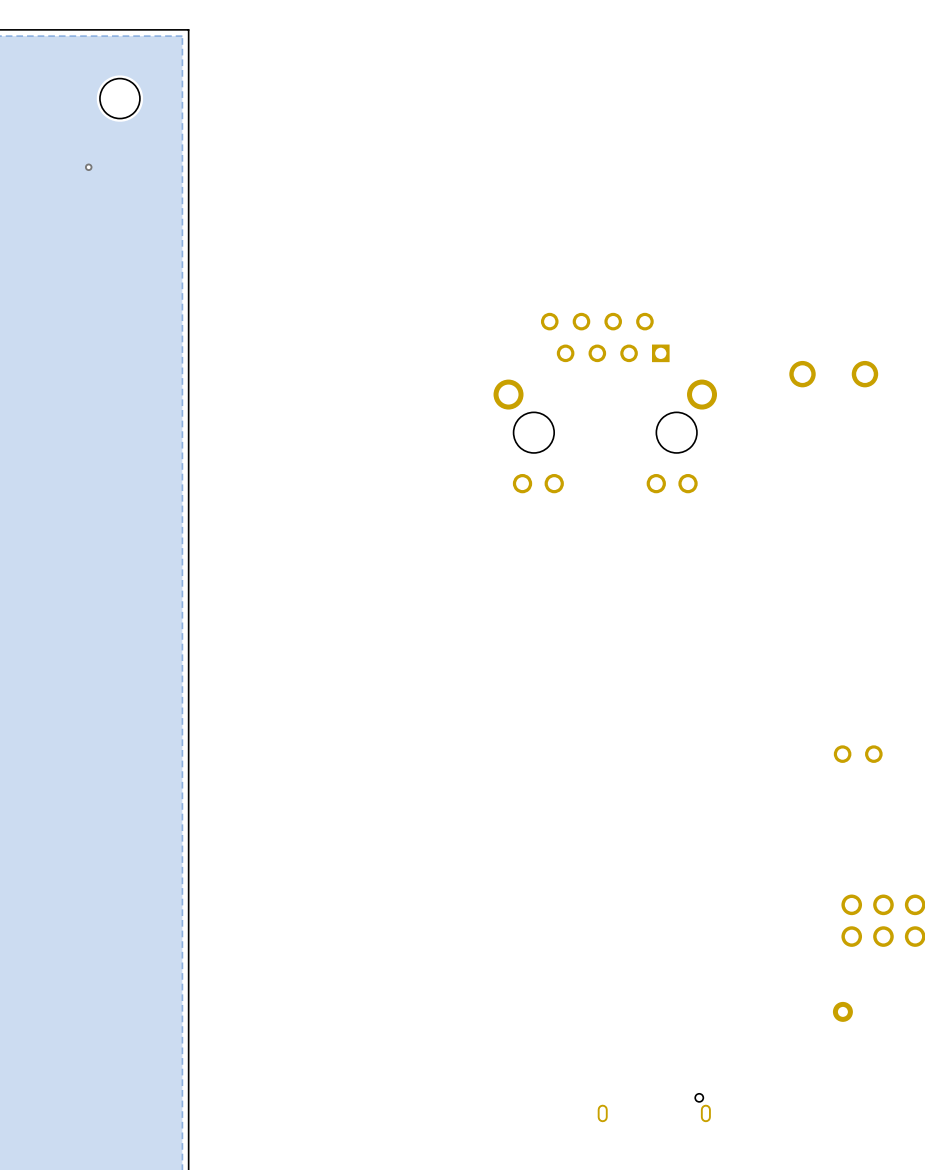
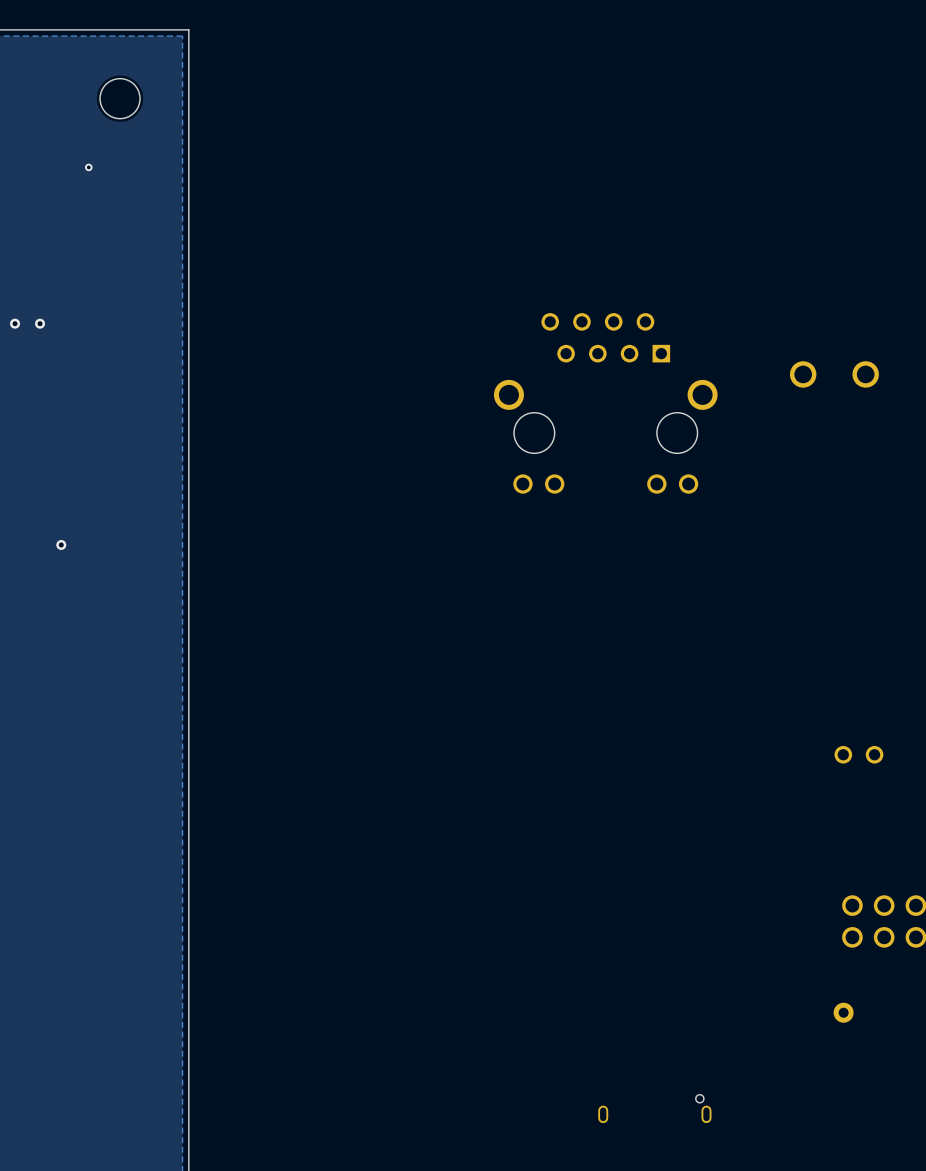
via: none -> (15, 323)
via: none -> (40, 323)
via: none -> (61, 544)

